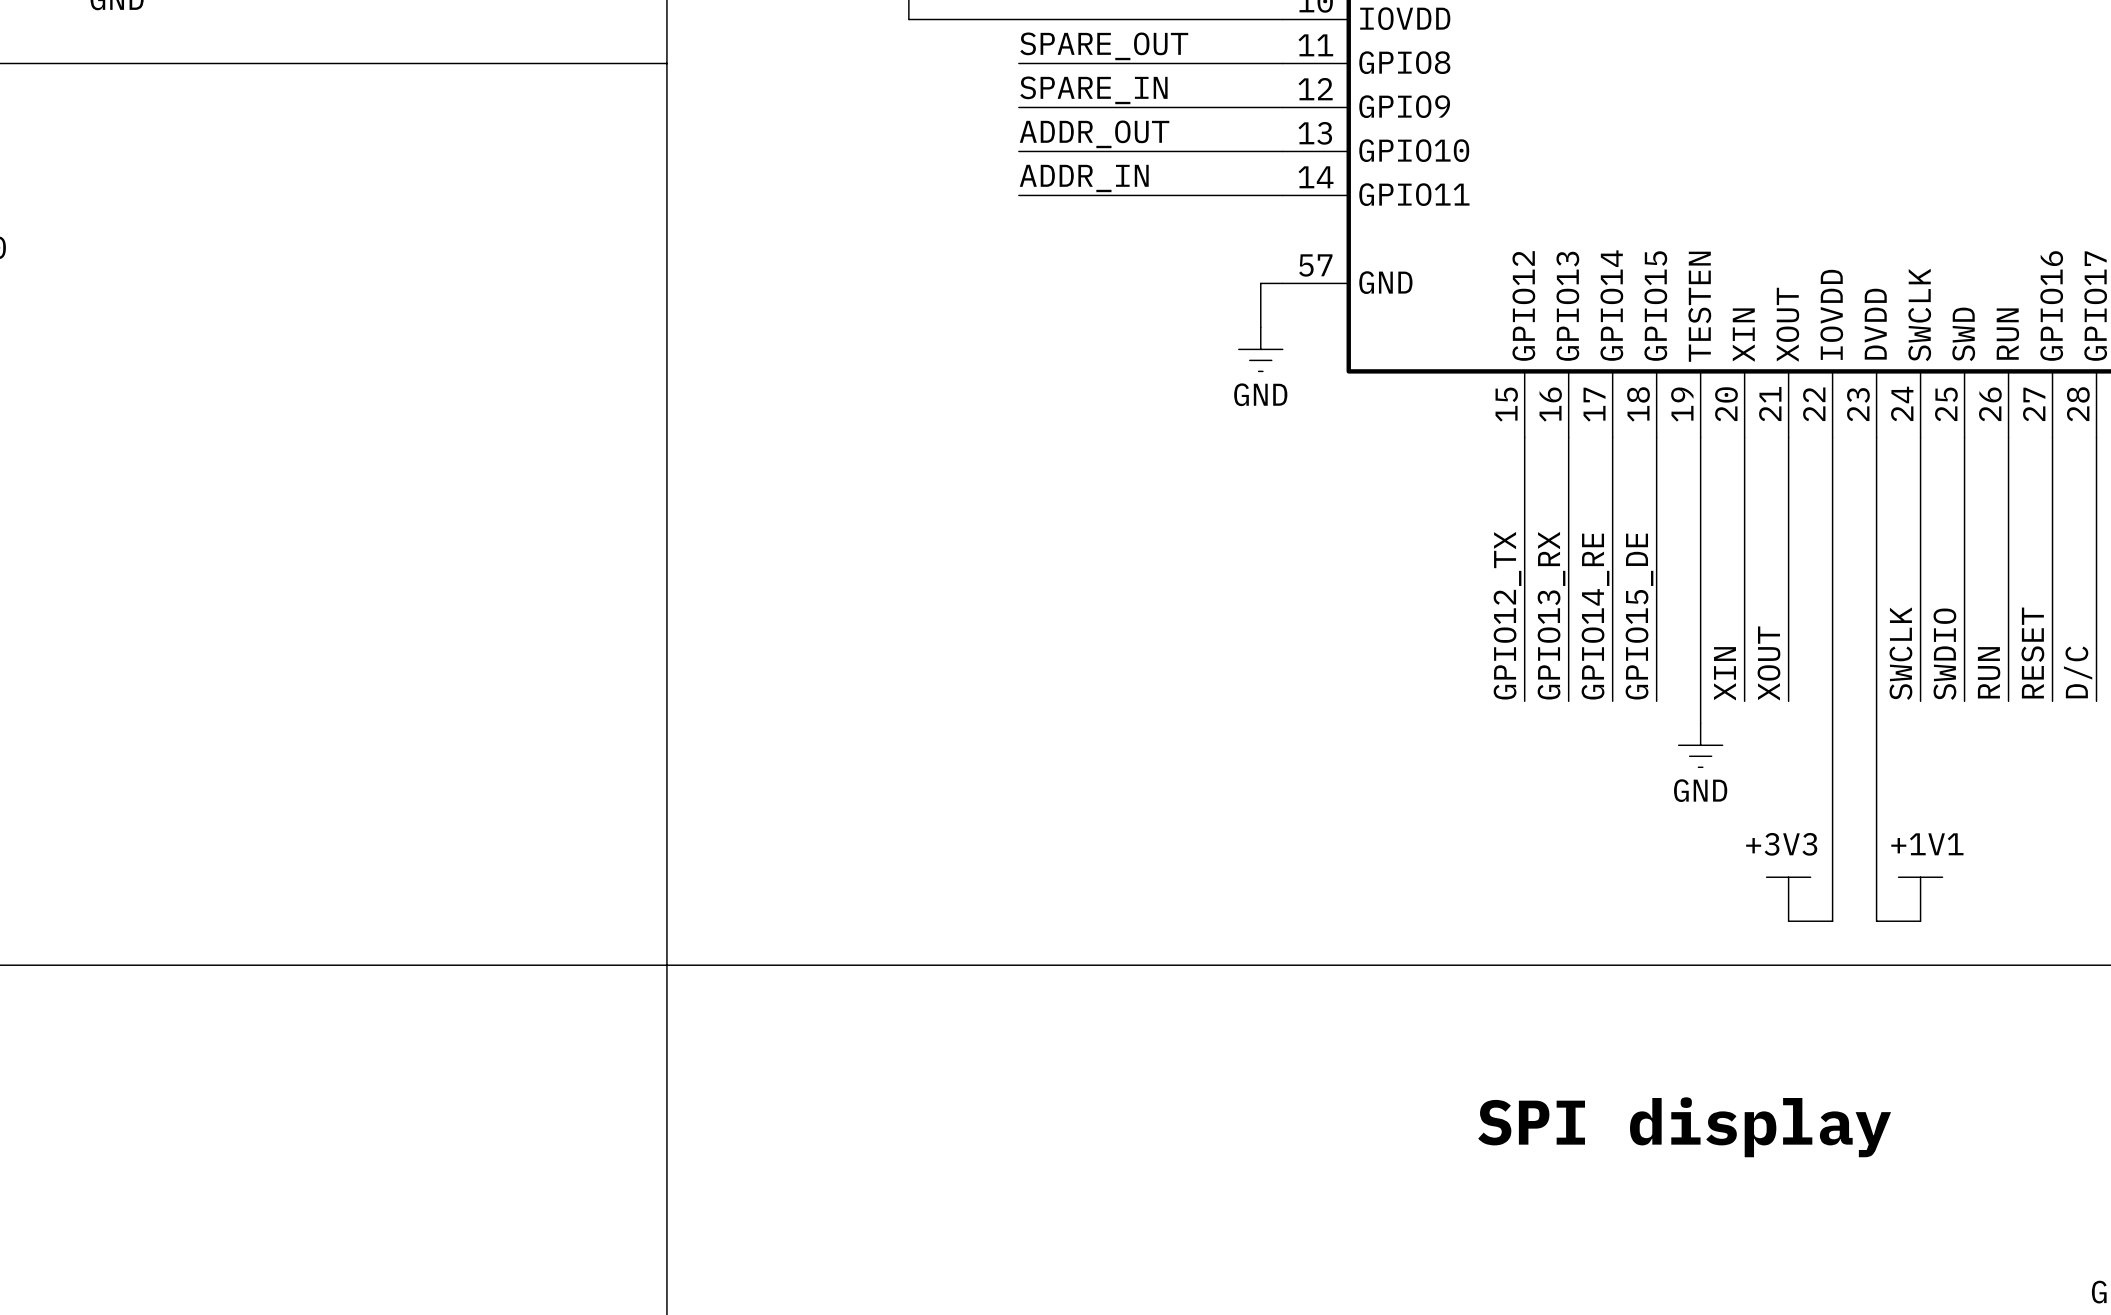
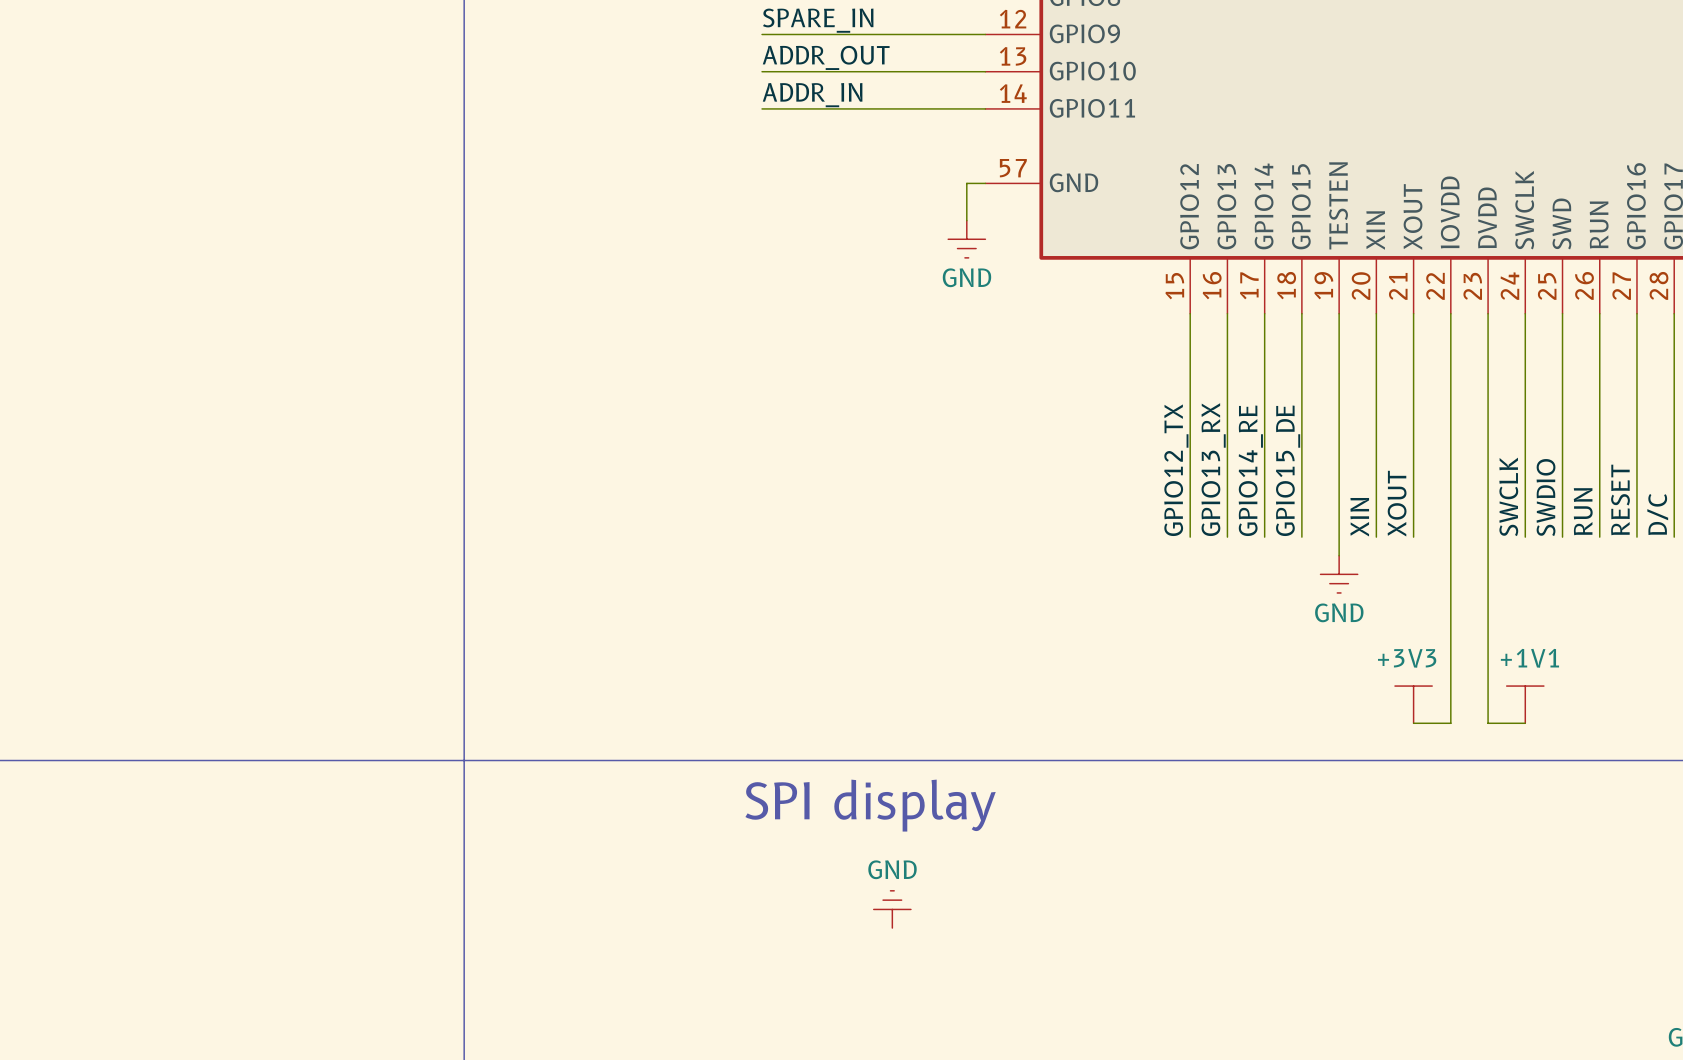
text: none -> SPI display (870, 805)
text: SPI display (1684, 1127) -> none
power symbol: none -> GND (892, 909)

